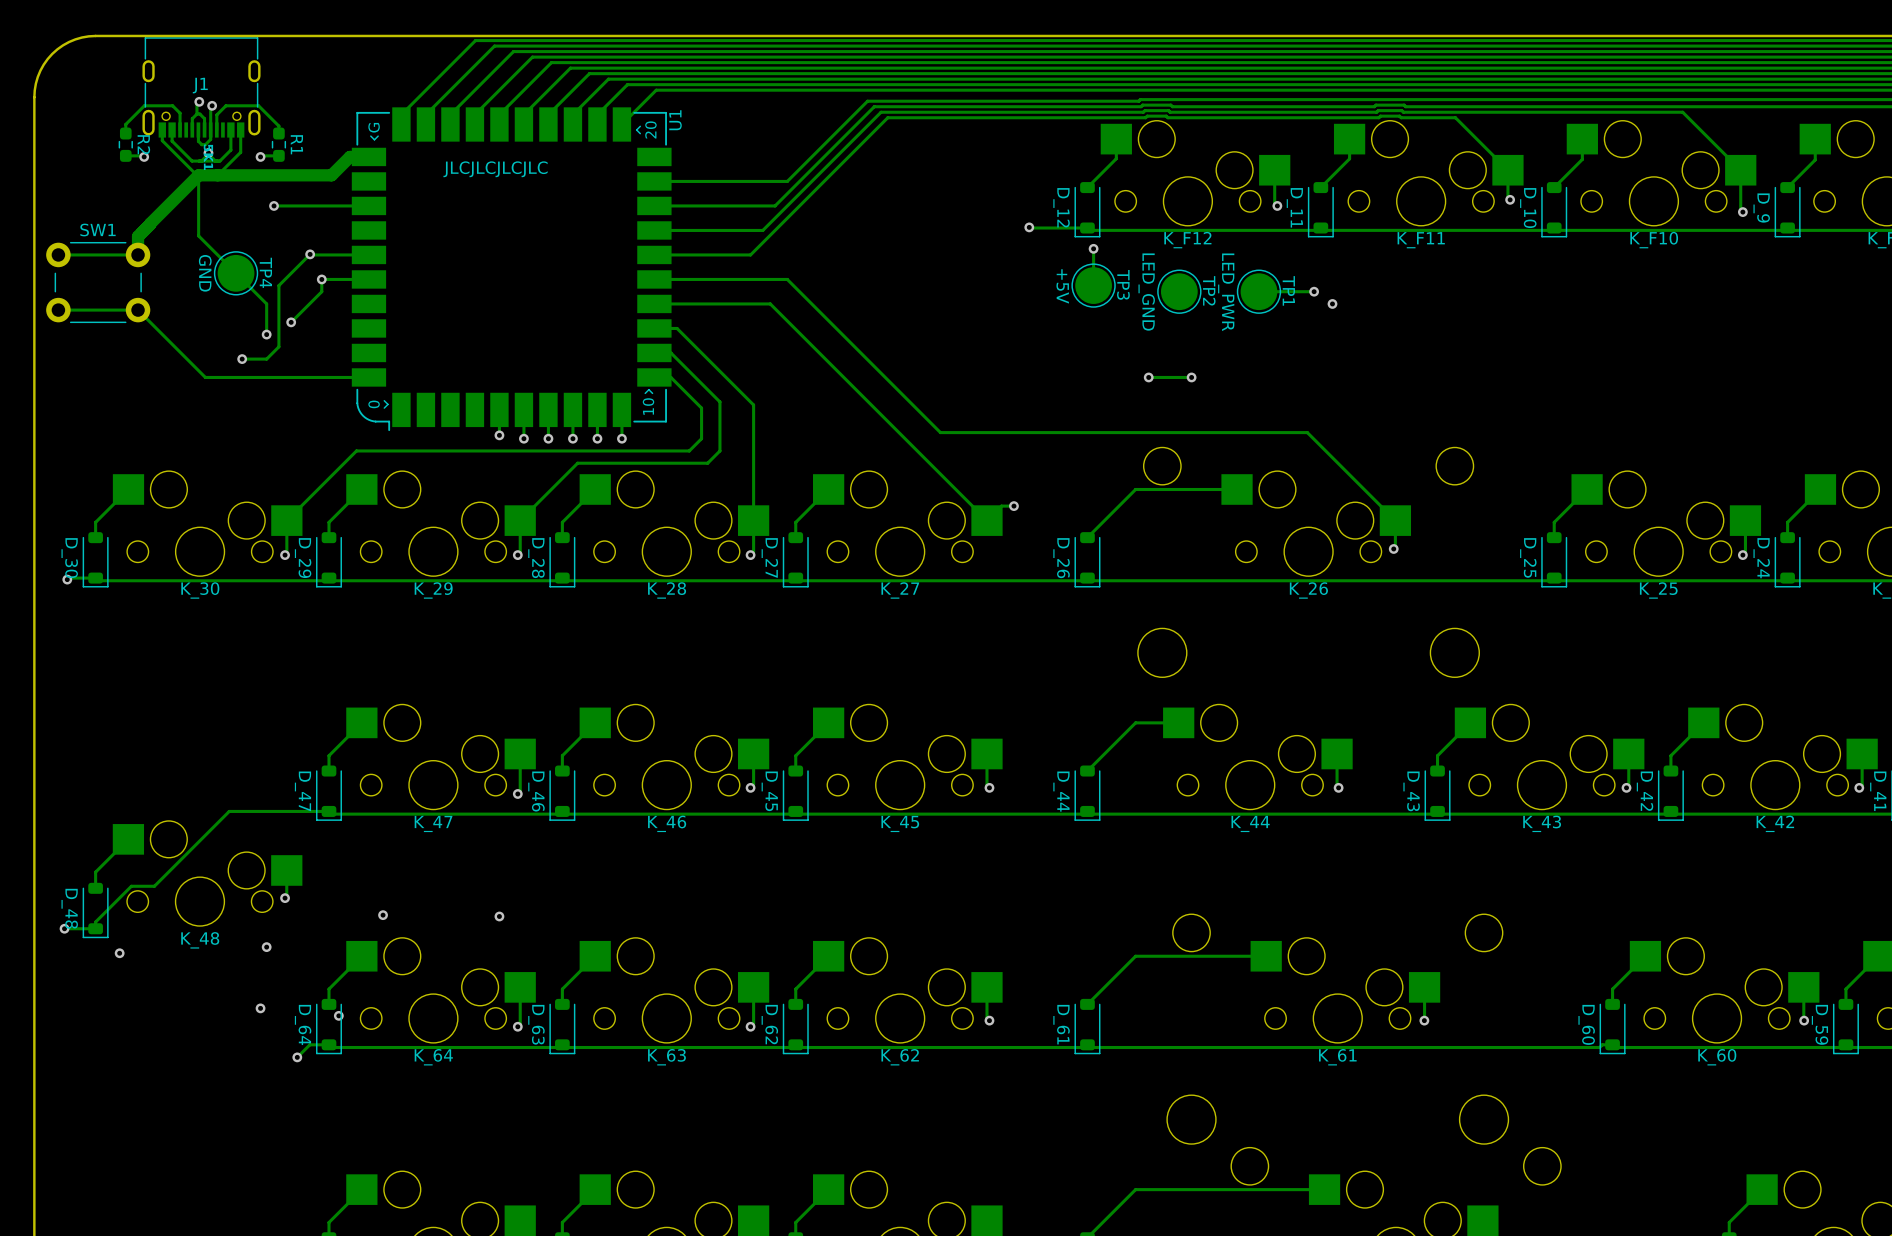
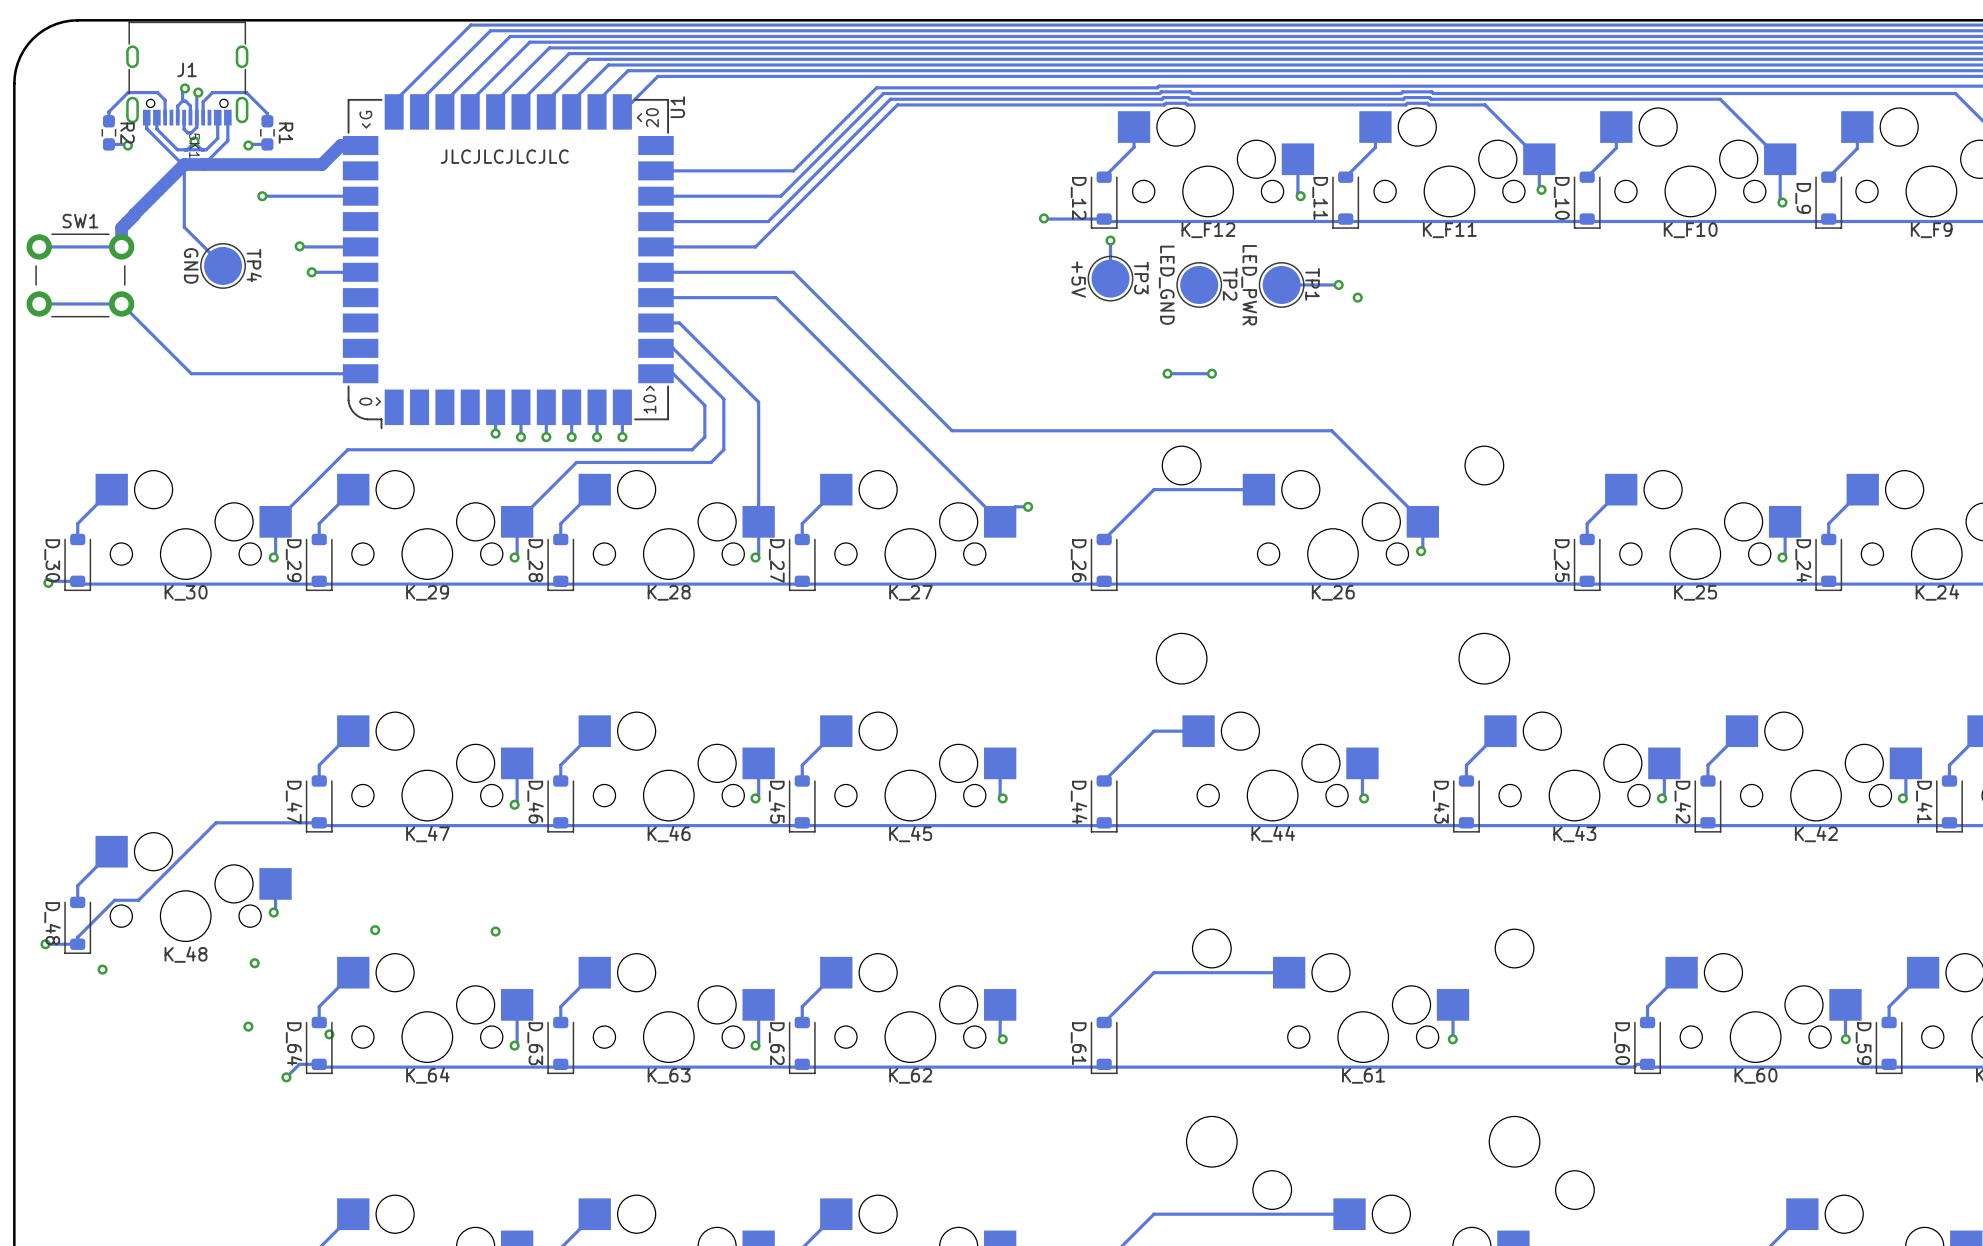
track: (310, 254) (278, 285) (278, 346) (266, 359) (242, 359) -> none
track: (236, 273) (266, 303) (266, 334) -> none
track: (321, 279) (321, 291) (291, 322) -> none
via: (291, 322) -> none
via: (266, 334) -> none
via: (242, 359) -> none

